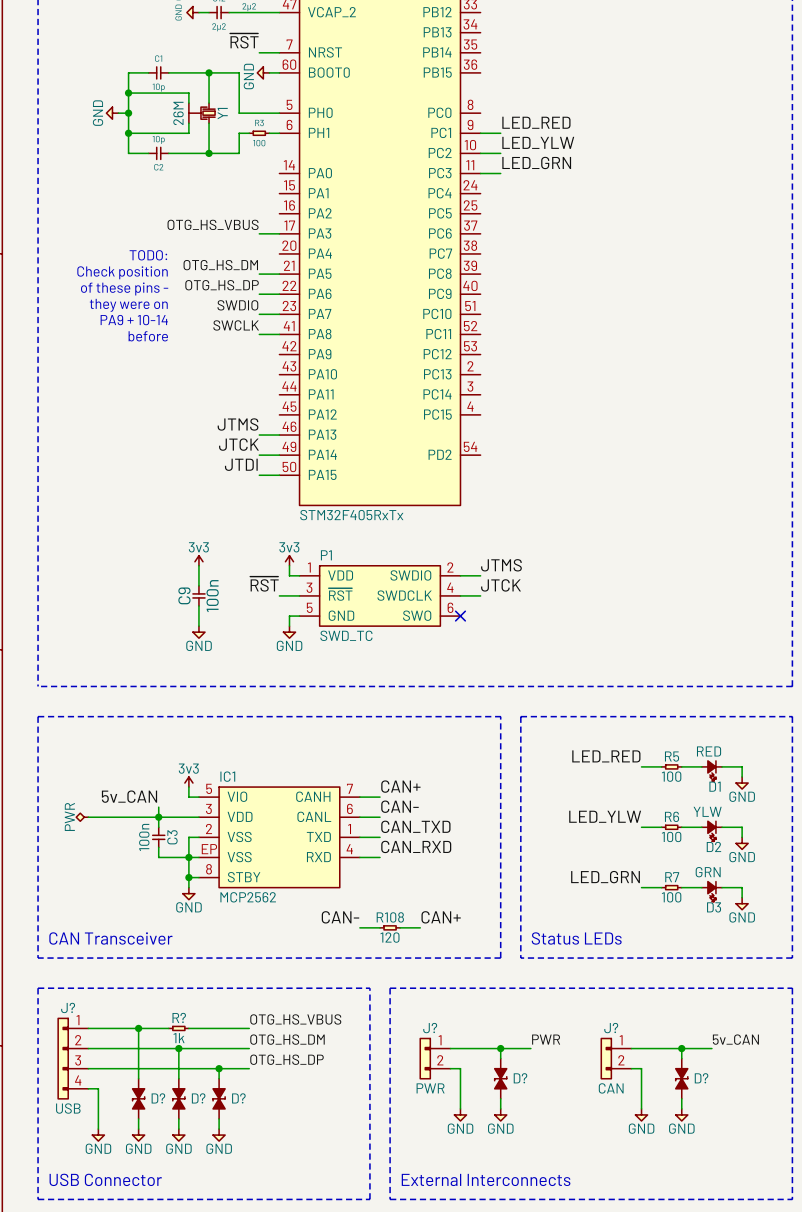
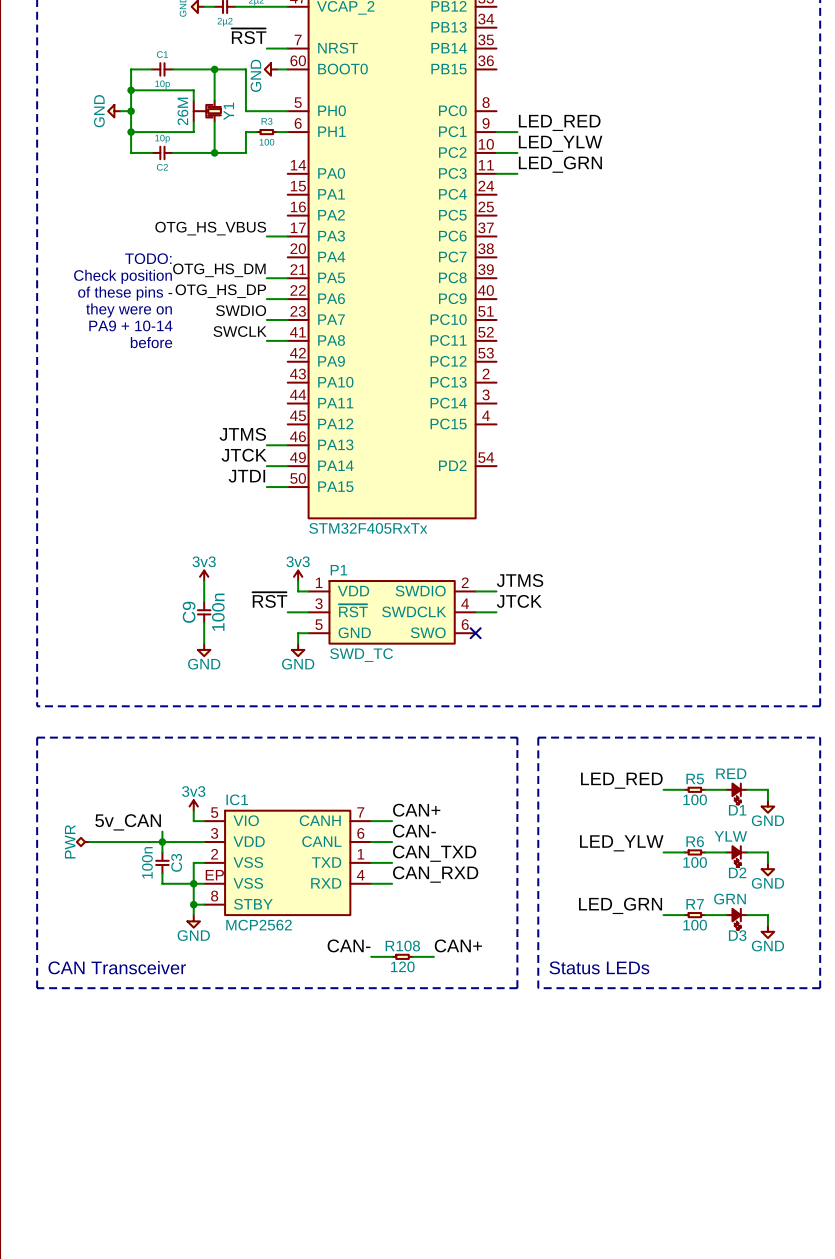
line: (38, 988) (38, 1199) (369, 1199) (369, 988) (38, 988) -> none
line: (390, 988) (792, 988) (792, 1199) (390, 1199) (390, 988) -> none
label: OTG_HS_VBUS (295, 1019) -> none
wire: (88, 1028) (168, 1028) -> none
wire: (138, 1028) (138, 1078) -> none
junction: (138, 1028) -> none
R?: 1k (178, 1028) -> none
wire: (188, 1028) (249, 1028) -> none
label: OTG_HS_DM (287, 1039) -> none
label: PWR (546, 1039) -> none
label: 5v_CAN (735, 1039) -> none
wire: (88, 1048) (249, 1048) -> none
wire: (178, 1048) (178, 1078) -> none
junction: (178, 1048) -> none
wire: (450, 1048) (530, 1048) -> none
wire: (500, 1048) (500, 1058) -> none
junction: (500, 1048) -> none
wire: (631, 1048) (711, 1048) -> none
wire: (681, 1048) (681, 1058) -> none
junction: (681, 1048) -> none
J?: USB (73, 1058) -> none
J?: PWR (435, 1058) -> none
J?: CAN (616, 1058) -> none
label: OTG_HS_DP (287, 1059) -> none
wire: (88, 1068) (249, 1068) -> none
wire: (219, 1068) (219, 1078) -> none
junction: (219, 1068) -> none
wire: (450, 1068) (460, 1068) (460, 1108) -> none
wire: (631, 1068) (641, 1068) (641, 1108) -> none
D?: (500, 1078) -> none
D?: (681, 1078) -> none
wire: (88, 1088) (98, 1088) (98, 1129) -> none
D?: (138, 1098) -> none
D?: (178, 1098) -> none
D?: (219, 1098) -> none
wire: (500, 1098) (500, 1108) -> none
wire: (681, 1098) (681, 1108) -> none
power symbol: GND (460, 1114) -> none
power symbol: GND (500, 1114) -> none
power symbol: GND (641, 1114) -> none
power symbol: GND (681, 1114) -> none
wire: (138, 1118) (138, 1129) -> none
wire: (178, 1118) (178, 1129) -> none
wire: (219, 1118) (219, 1129) -> none
power symbol: GND (98, 1135) -> none
power symbol: GND (138, 1135) -> none
power symbol: GND (178, 1135) -> none
power symbol: GND (219, 1135) -> none
text: USB Connector (105, 1179) -> none
text: External Interconnects (486, 1179) -> none

